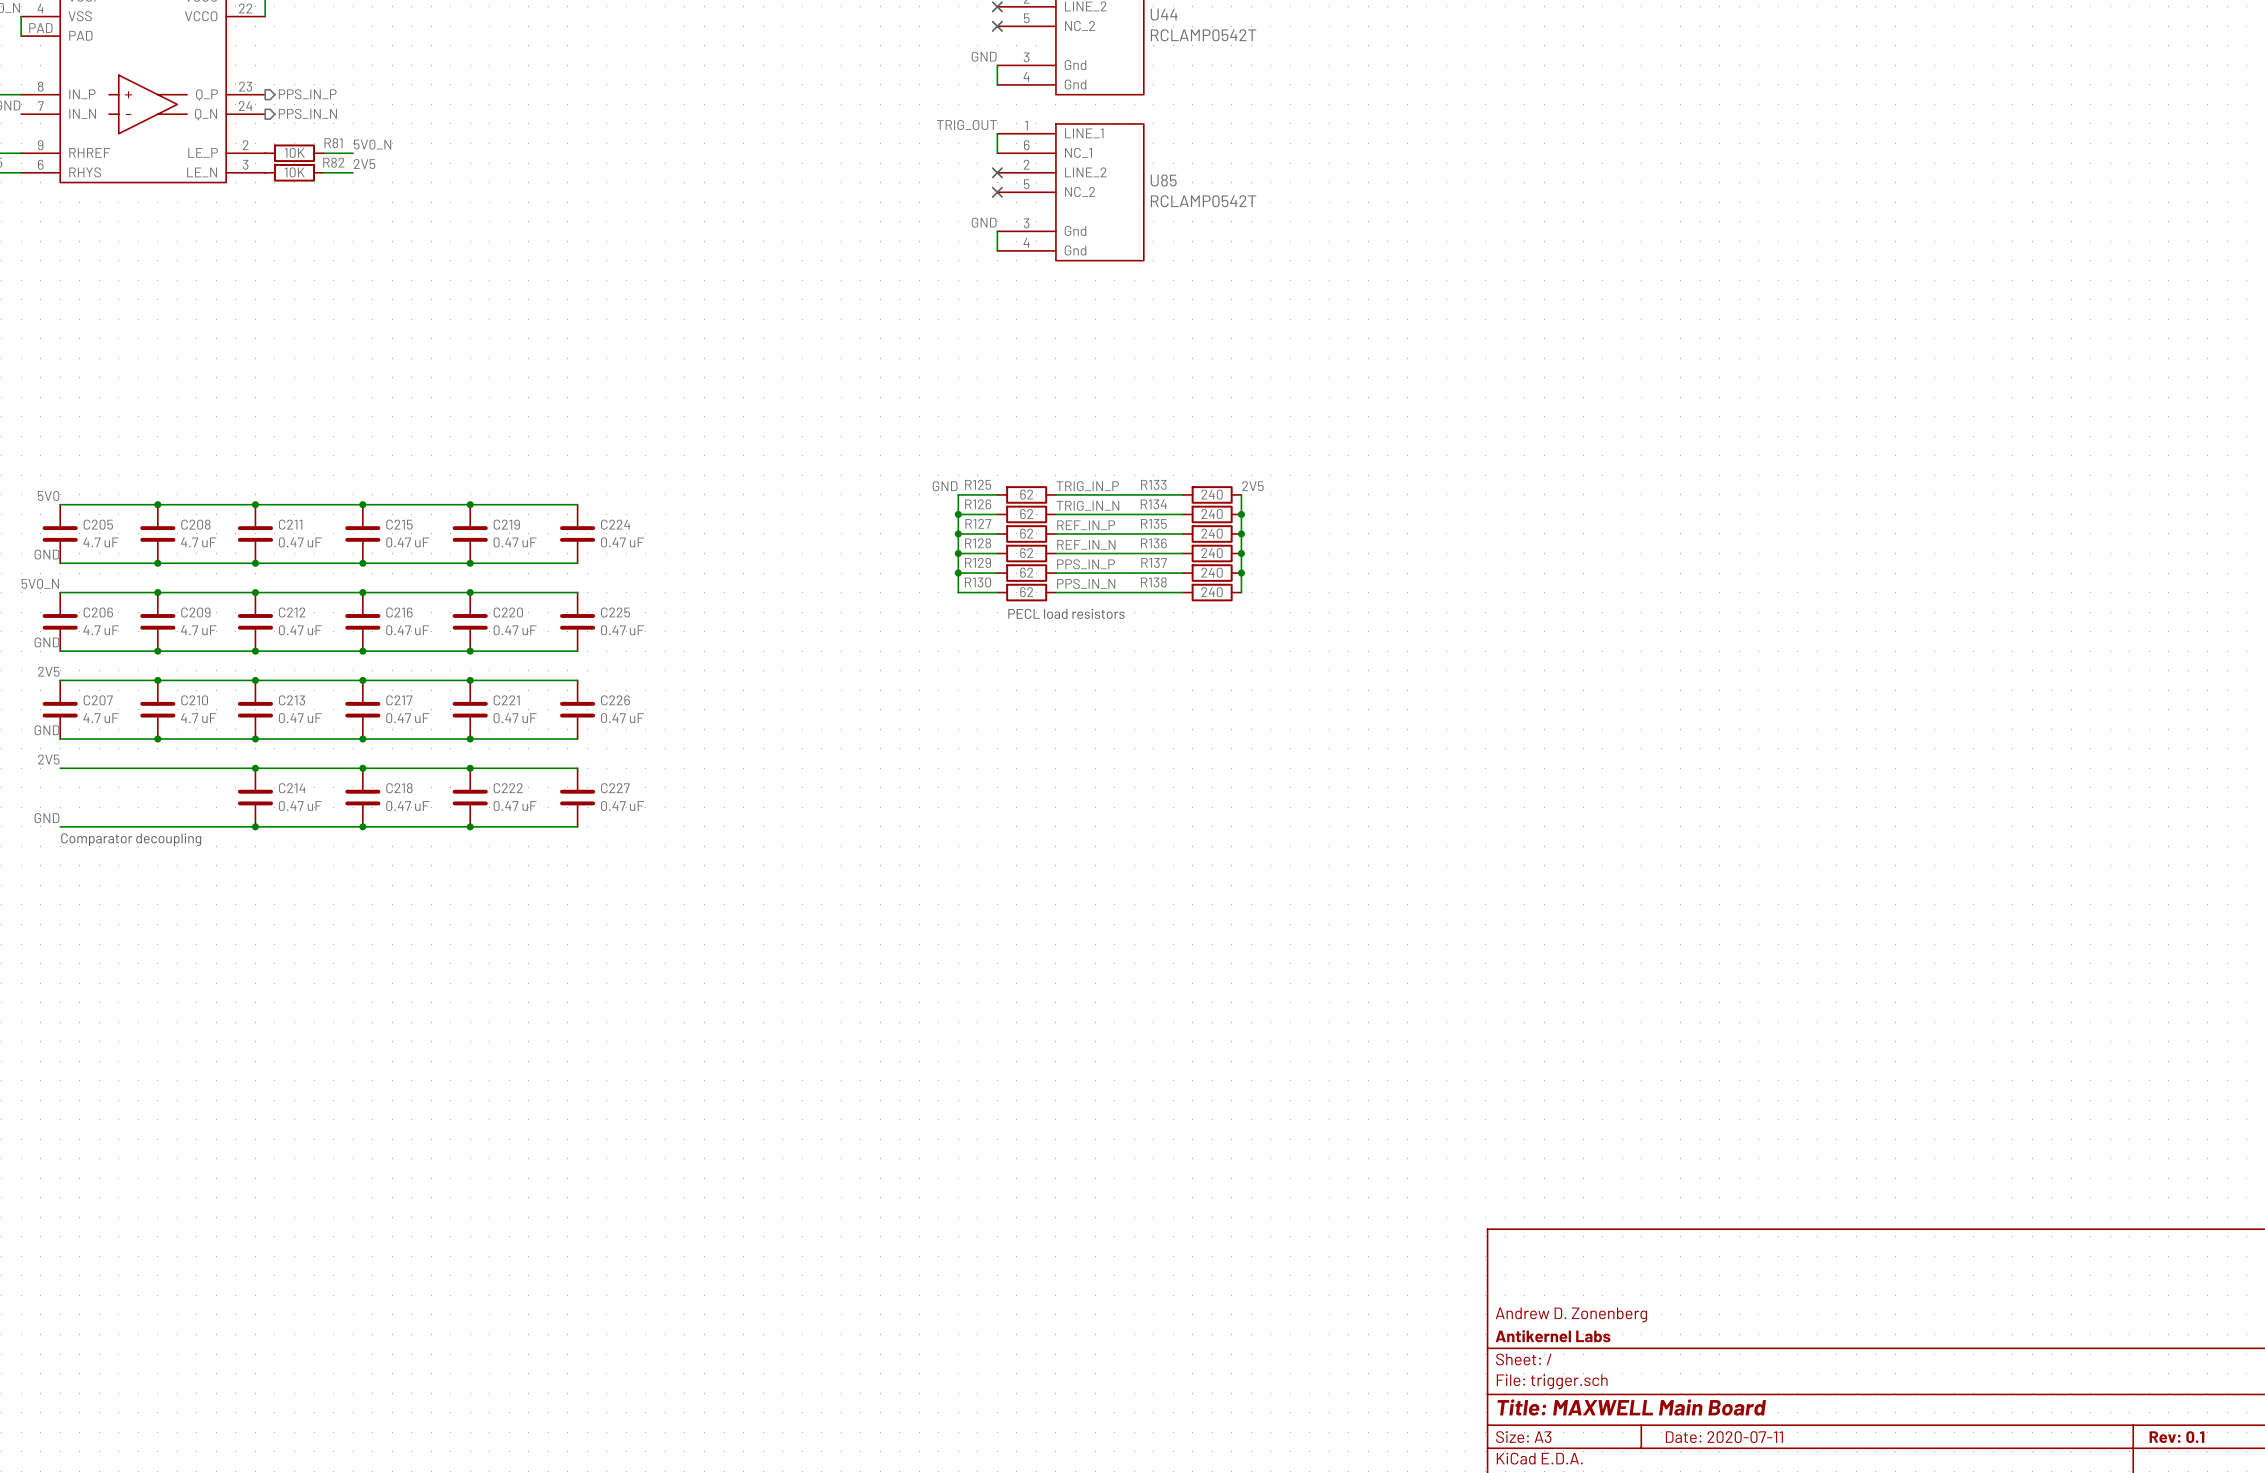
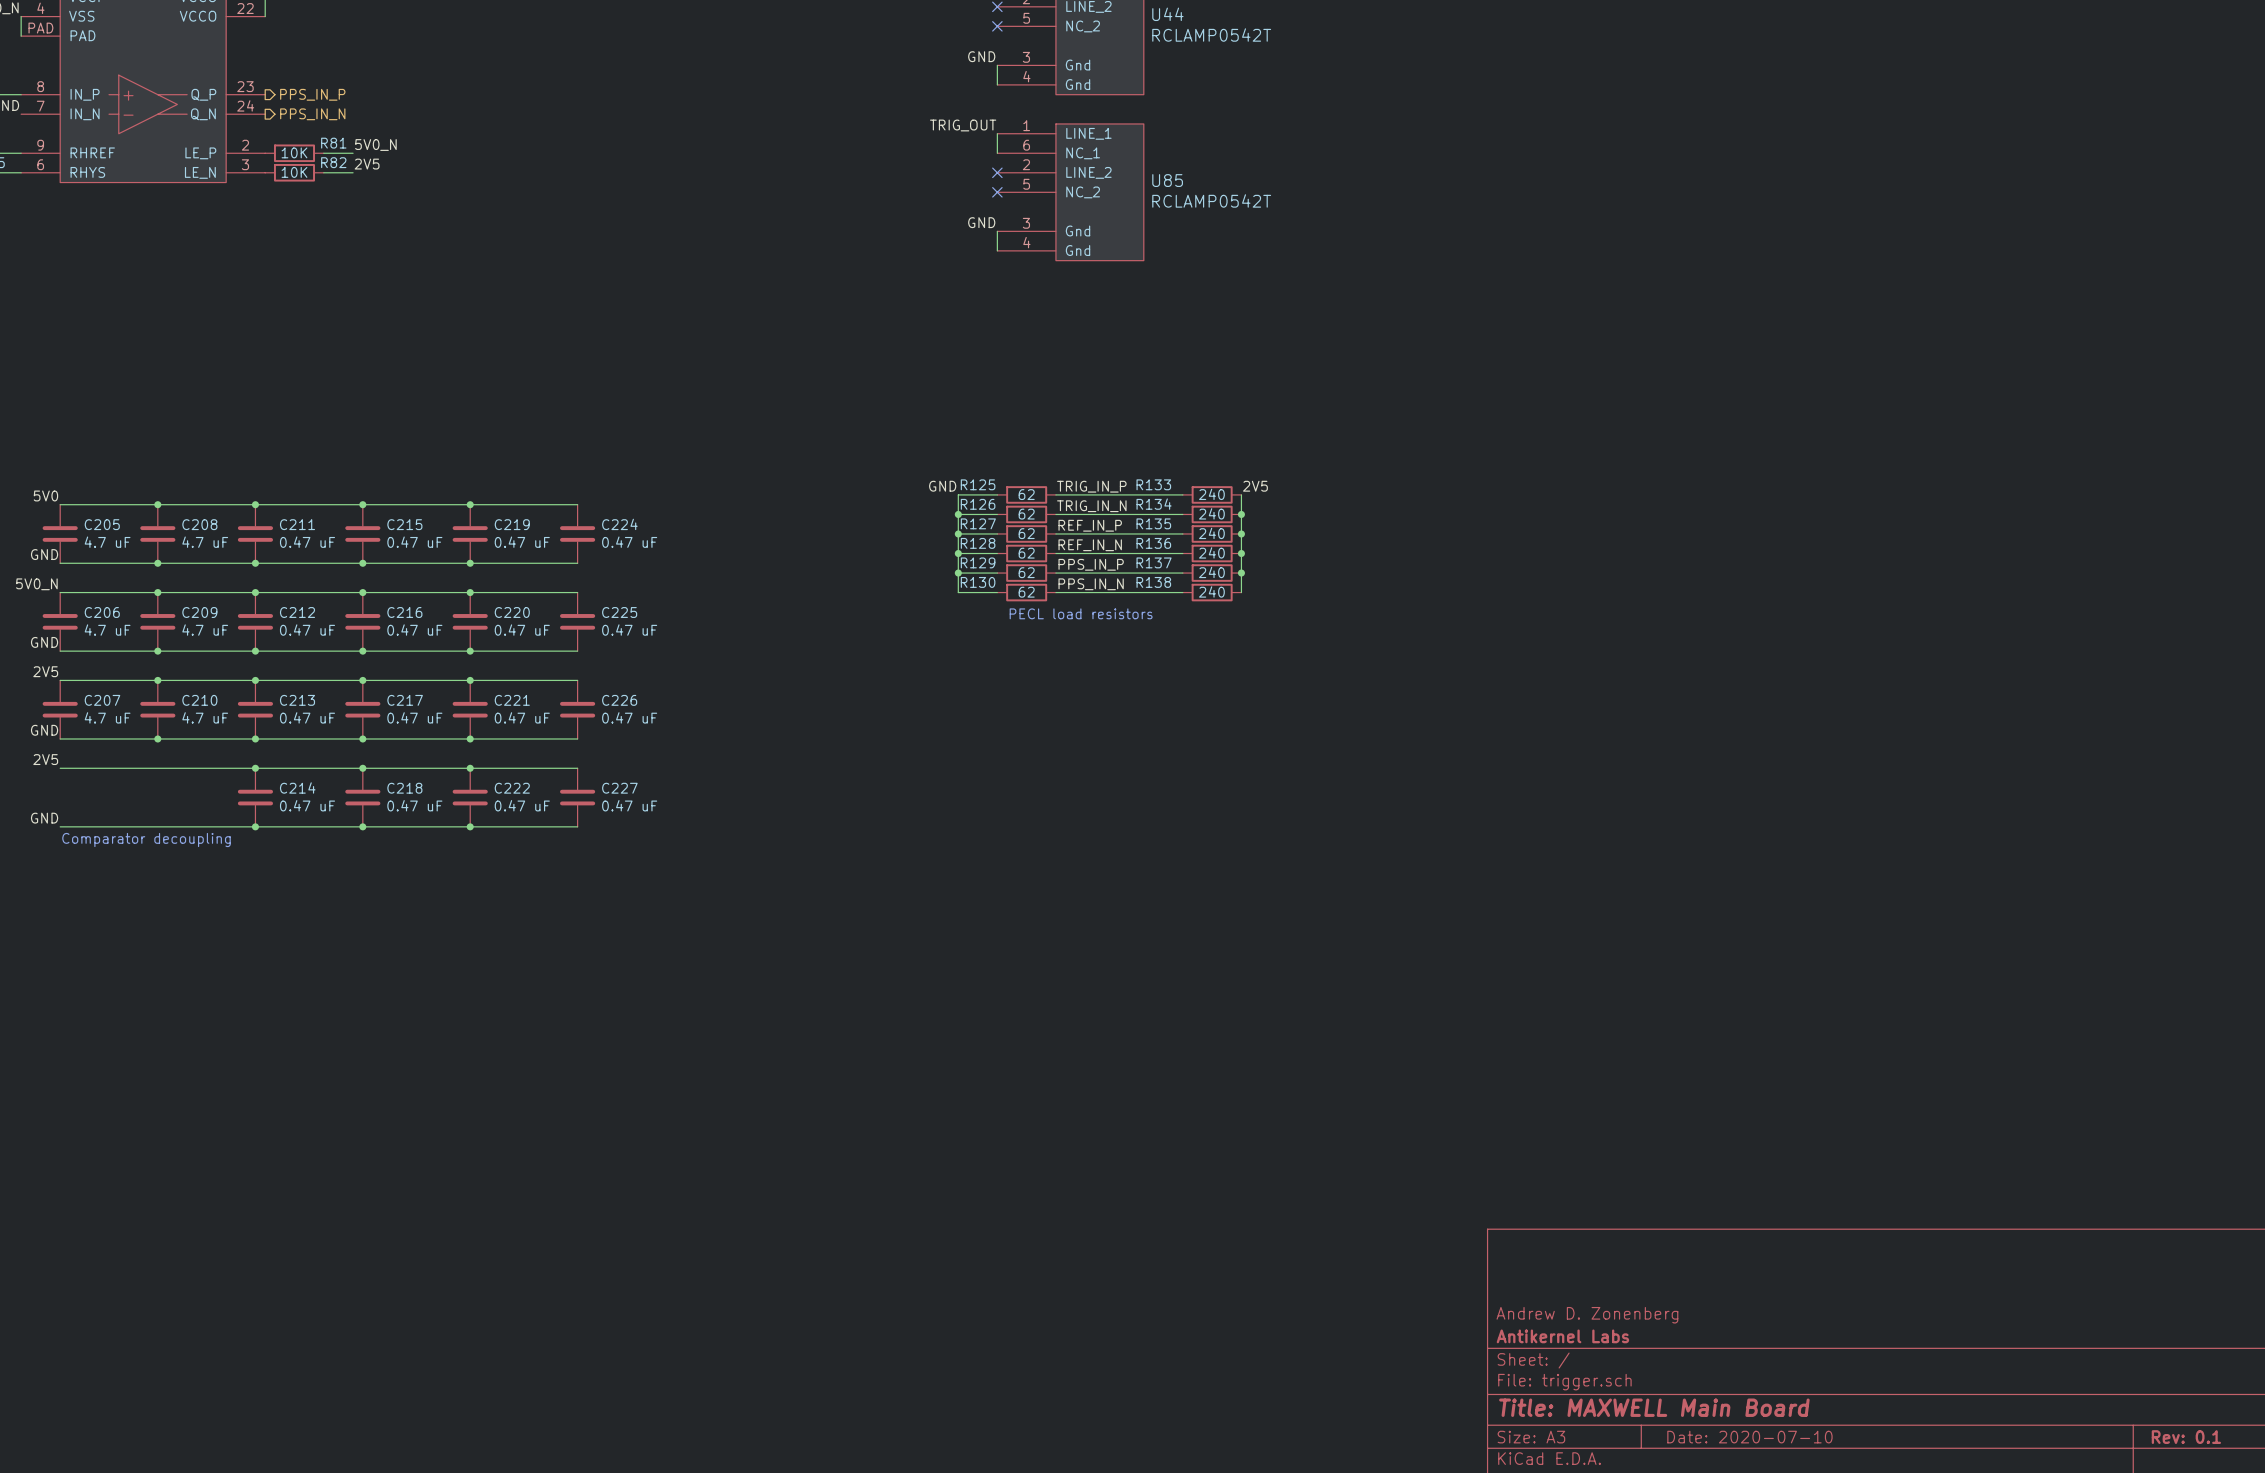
title block: Date: 2020-07-11 (1724, 1437) -> Date: 2020-07-10 (1749, 1437)

